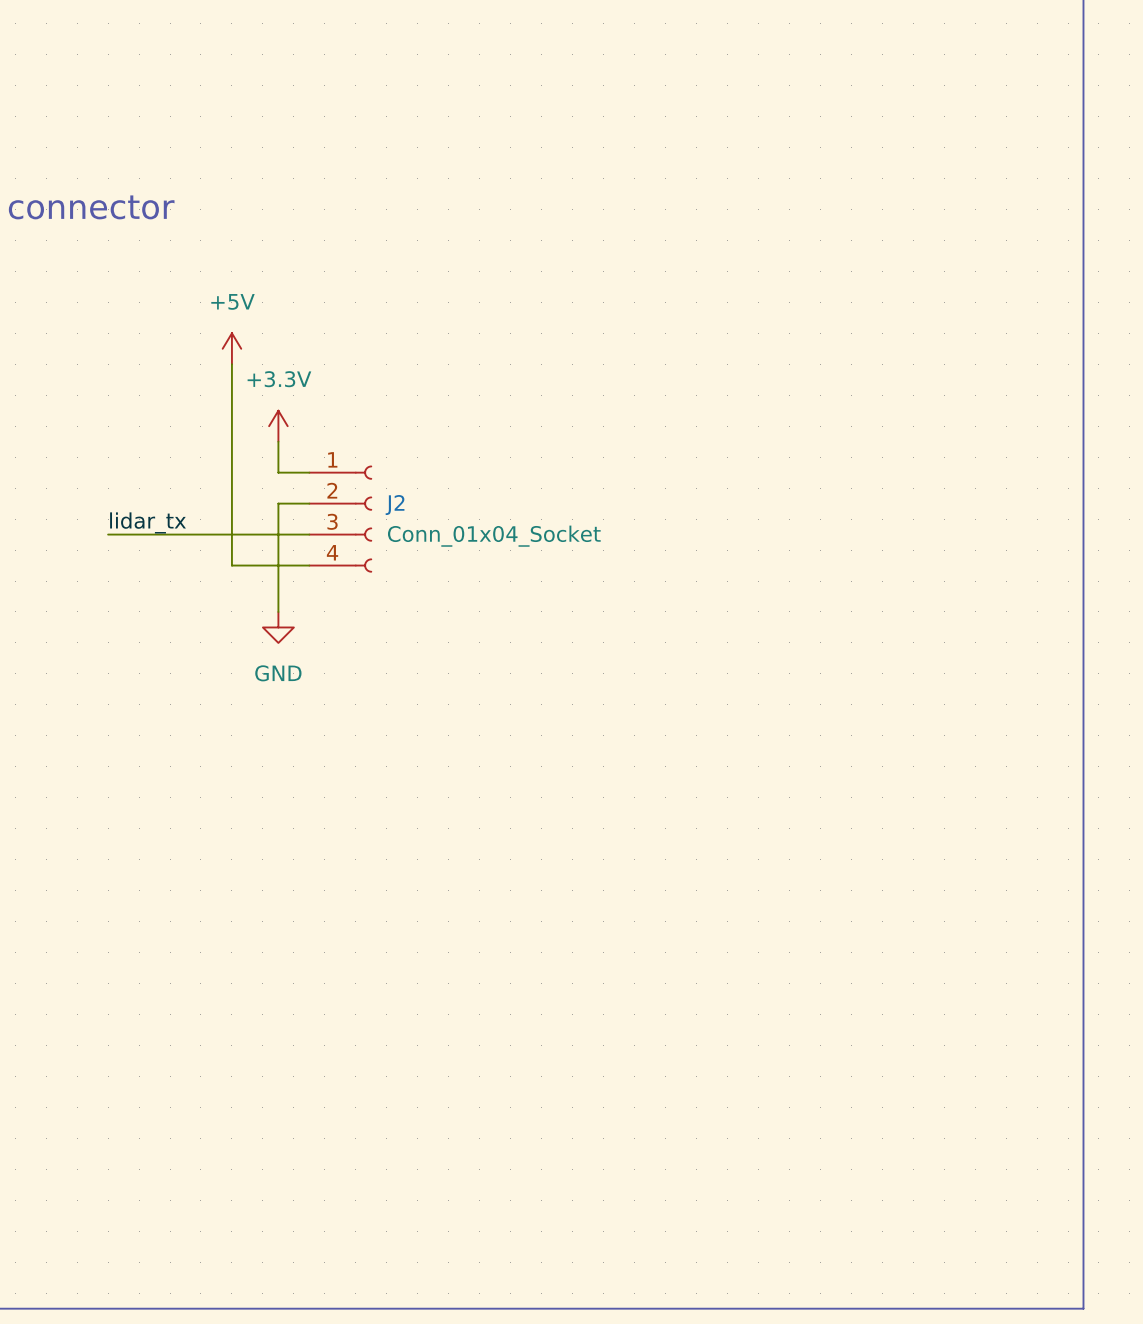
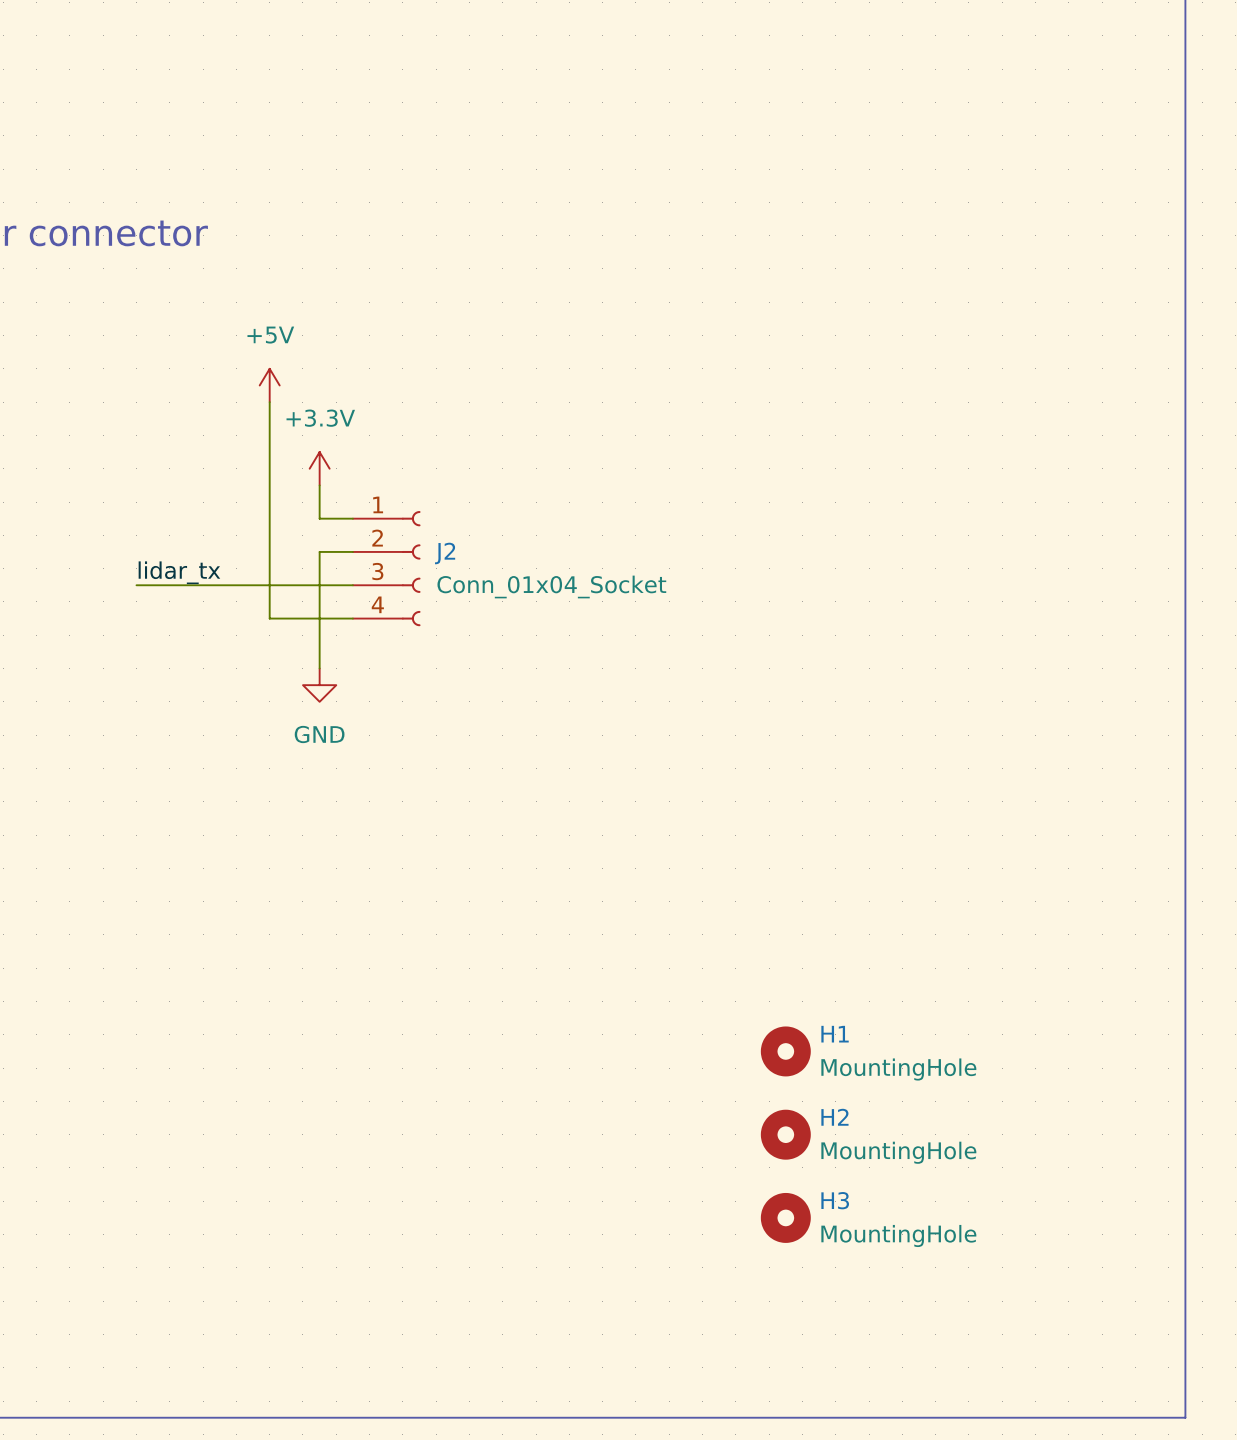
H1: none -> MountingHole (785, 1051)
H2: none -> MountingHole (785, 1134)
H3: none -> MountingHole (785, 1217)

